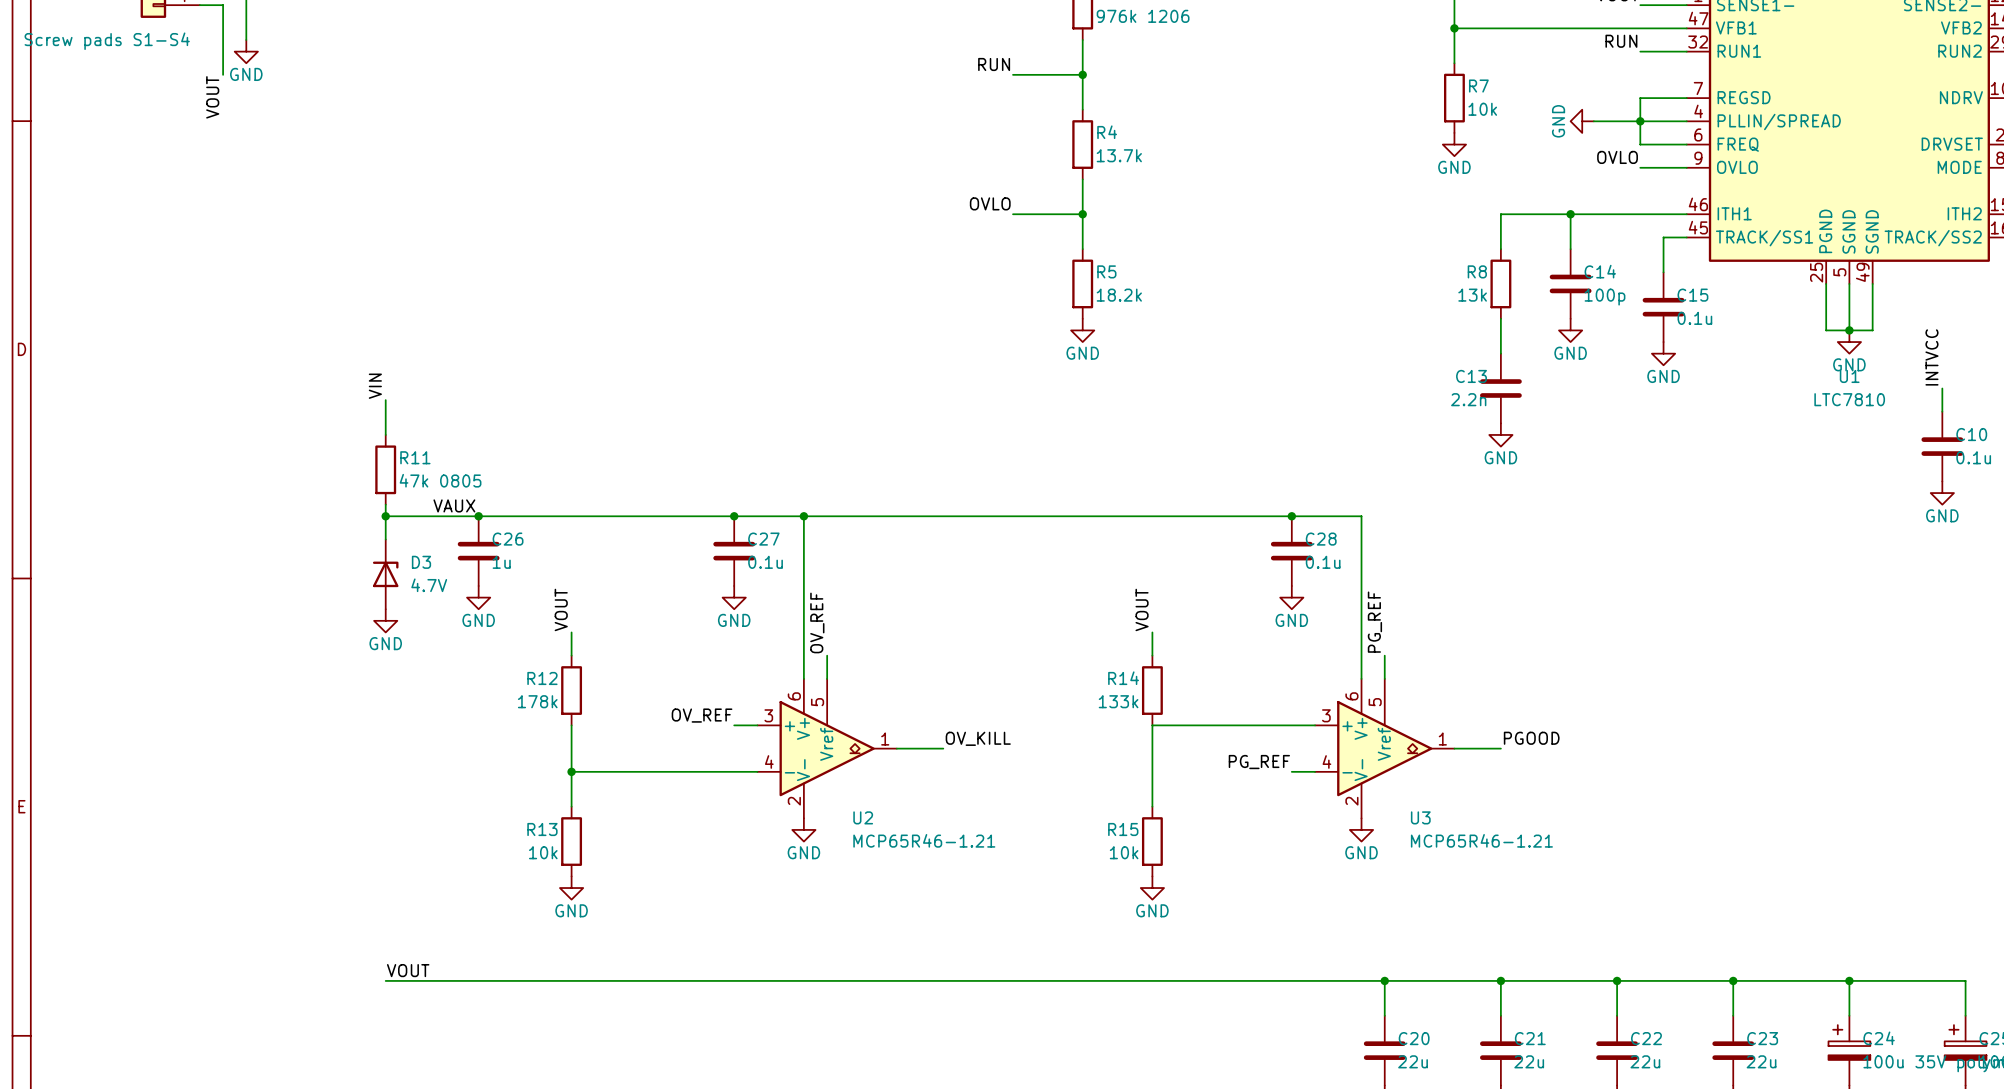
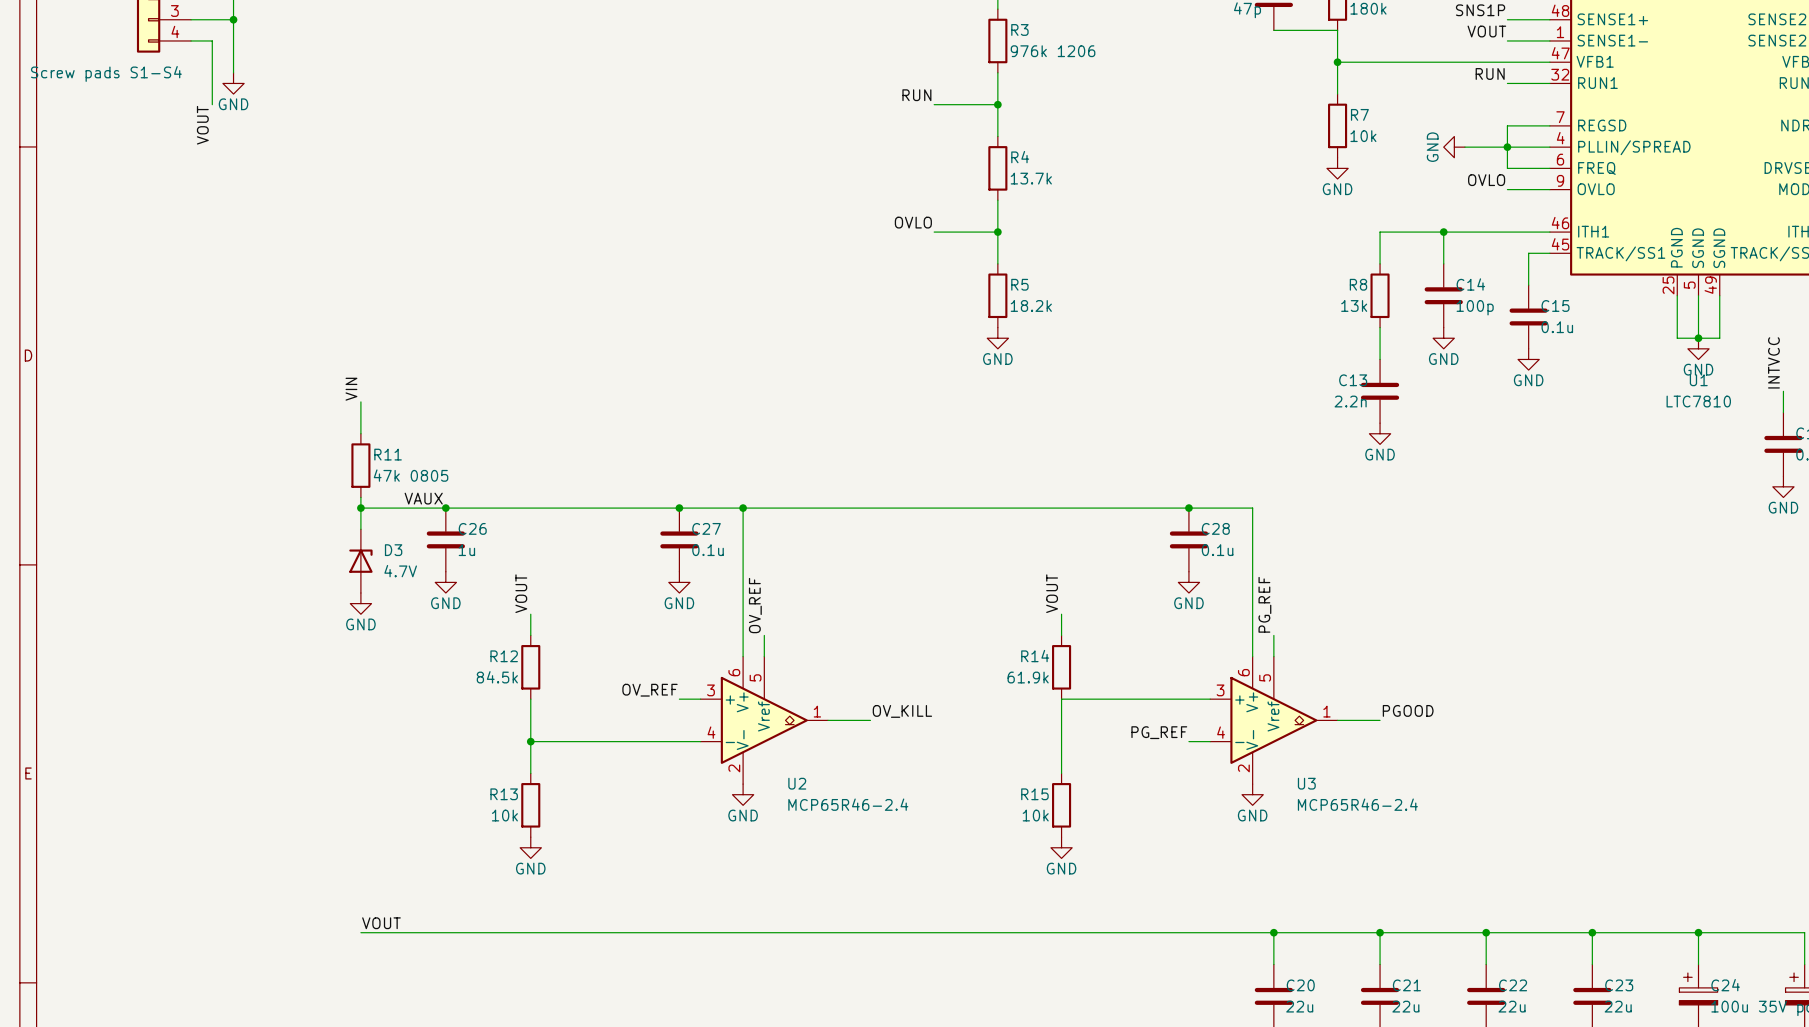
R12 value: 178k (537, 701) -> 84.5k (497, 677)
R14 value: 133k (1118, 701) -> 61.9k (1028, 677)
U2 value: MCP65R46-1.21 (924, 840) -> MCP65R46-2.4 (848, 804)
U3 value: MCP65R46-1.21 (1481, 840) -> MCP65R46-2.4 (1357, 804)

